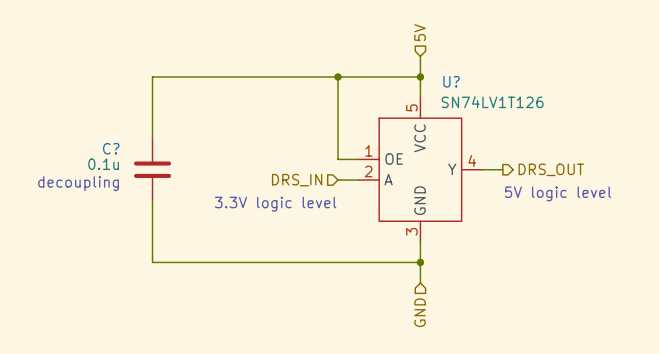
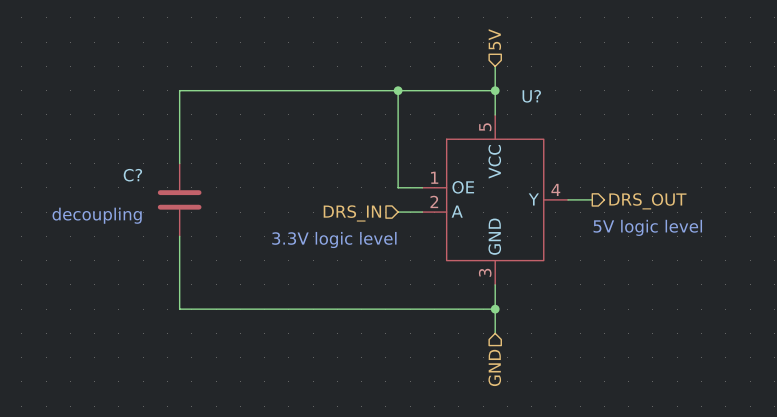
U? value: SN74LV1T126 (492, 102) -> none
C? value: 0.1u (103, 164) -> none

